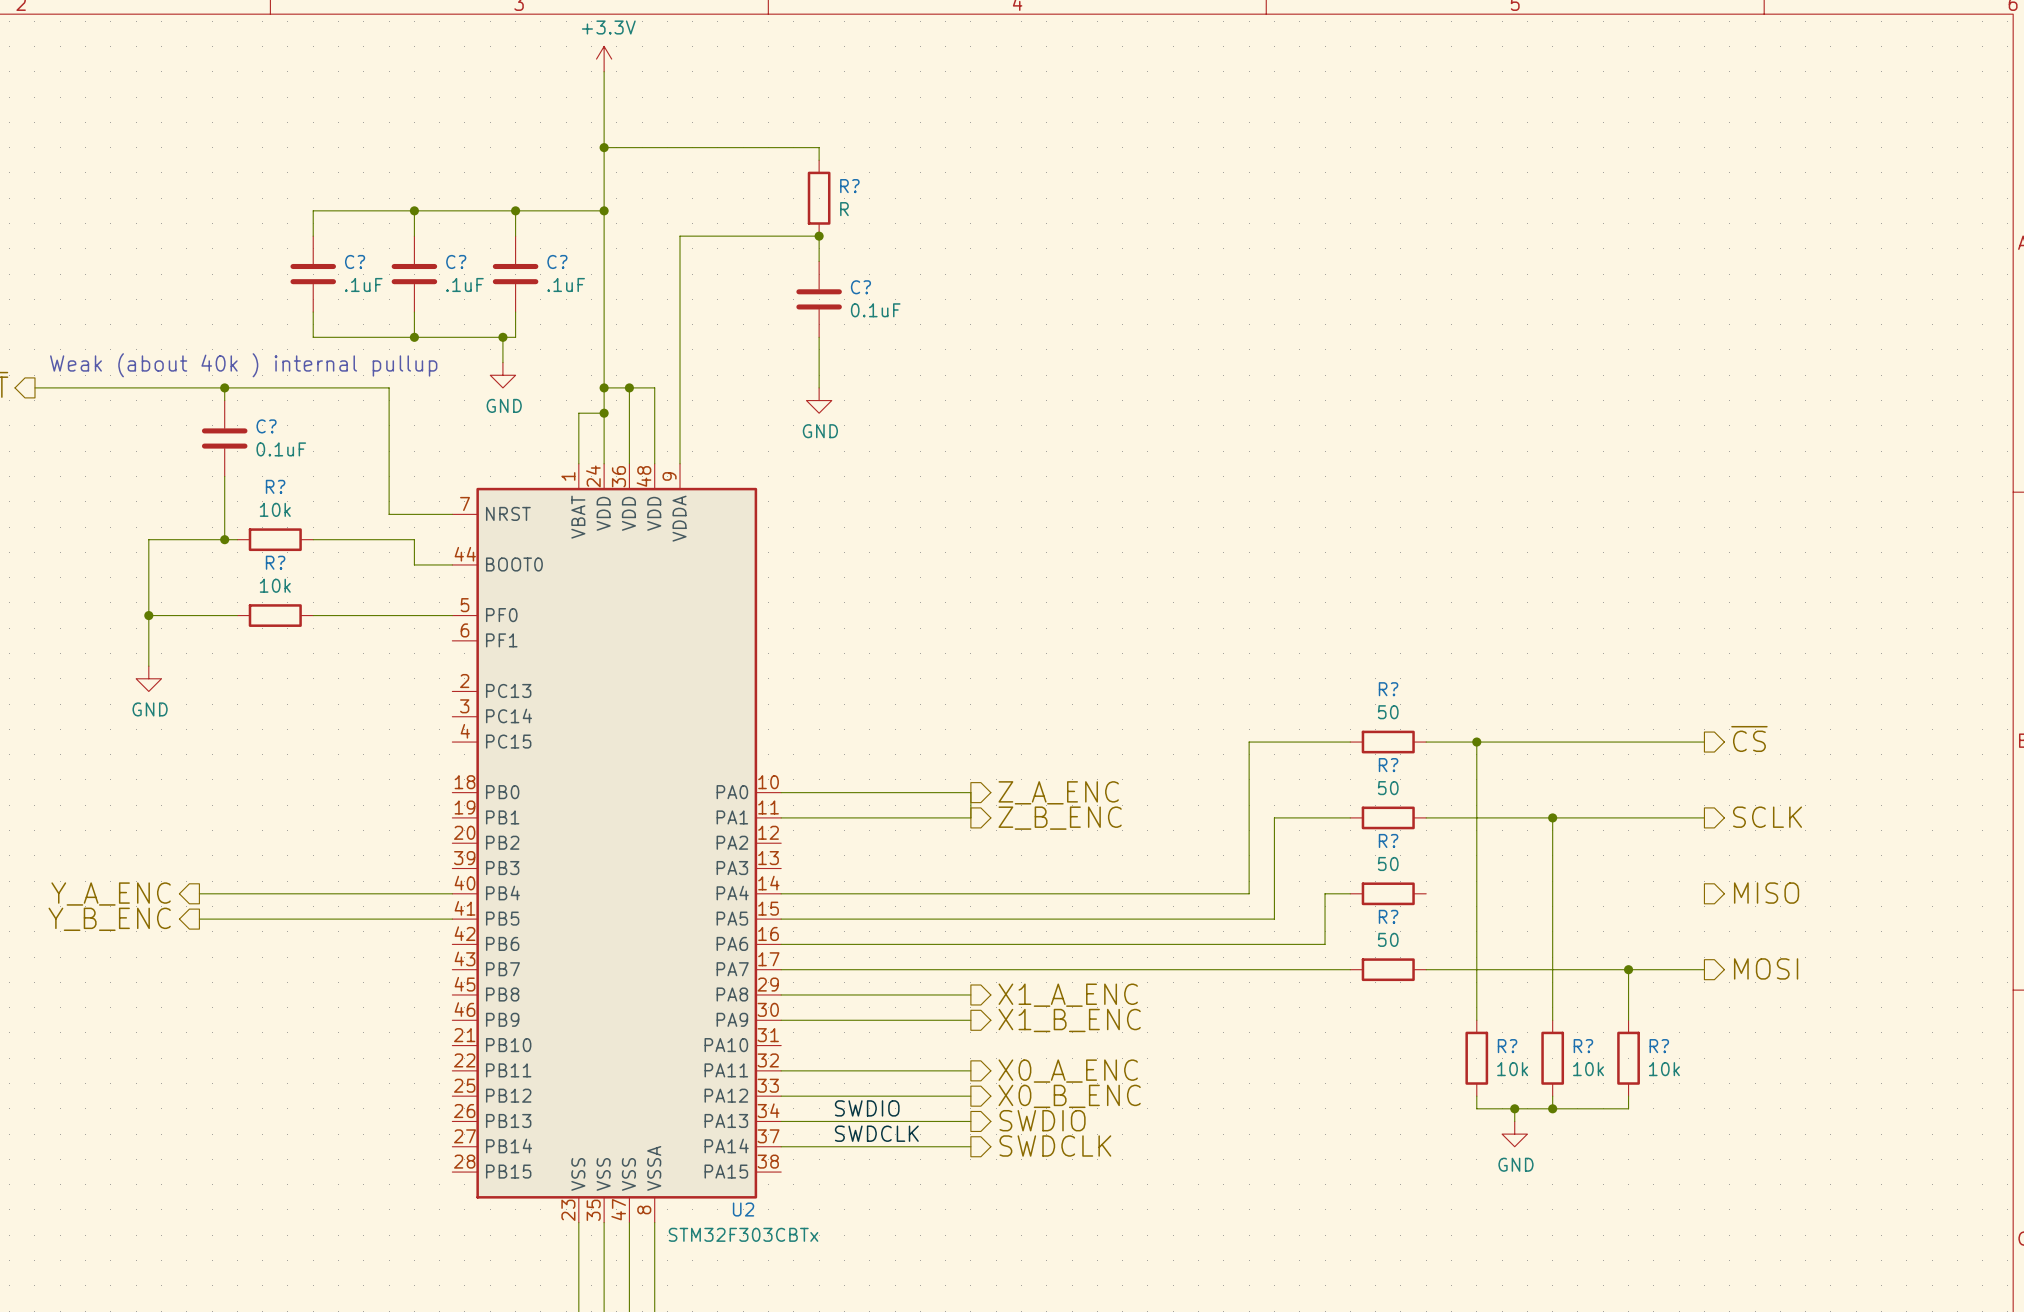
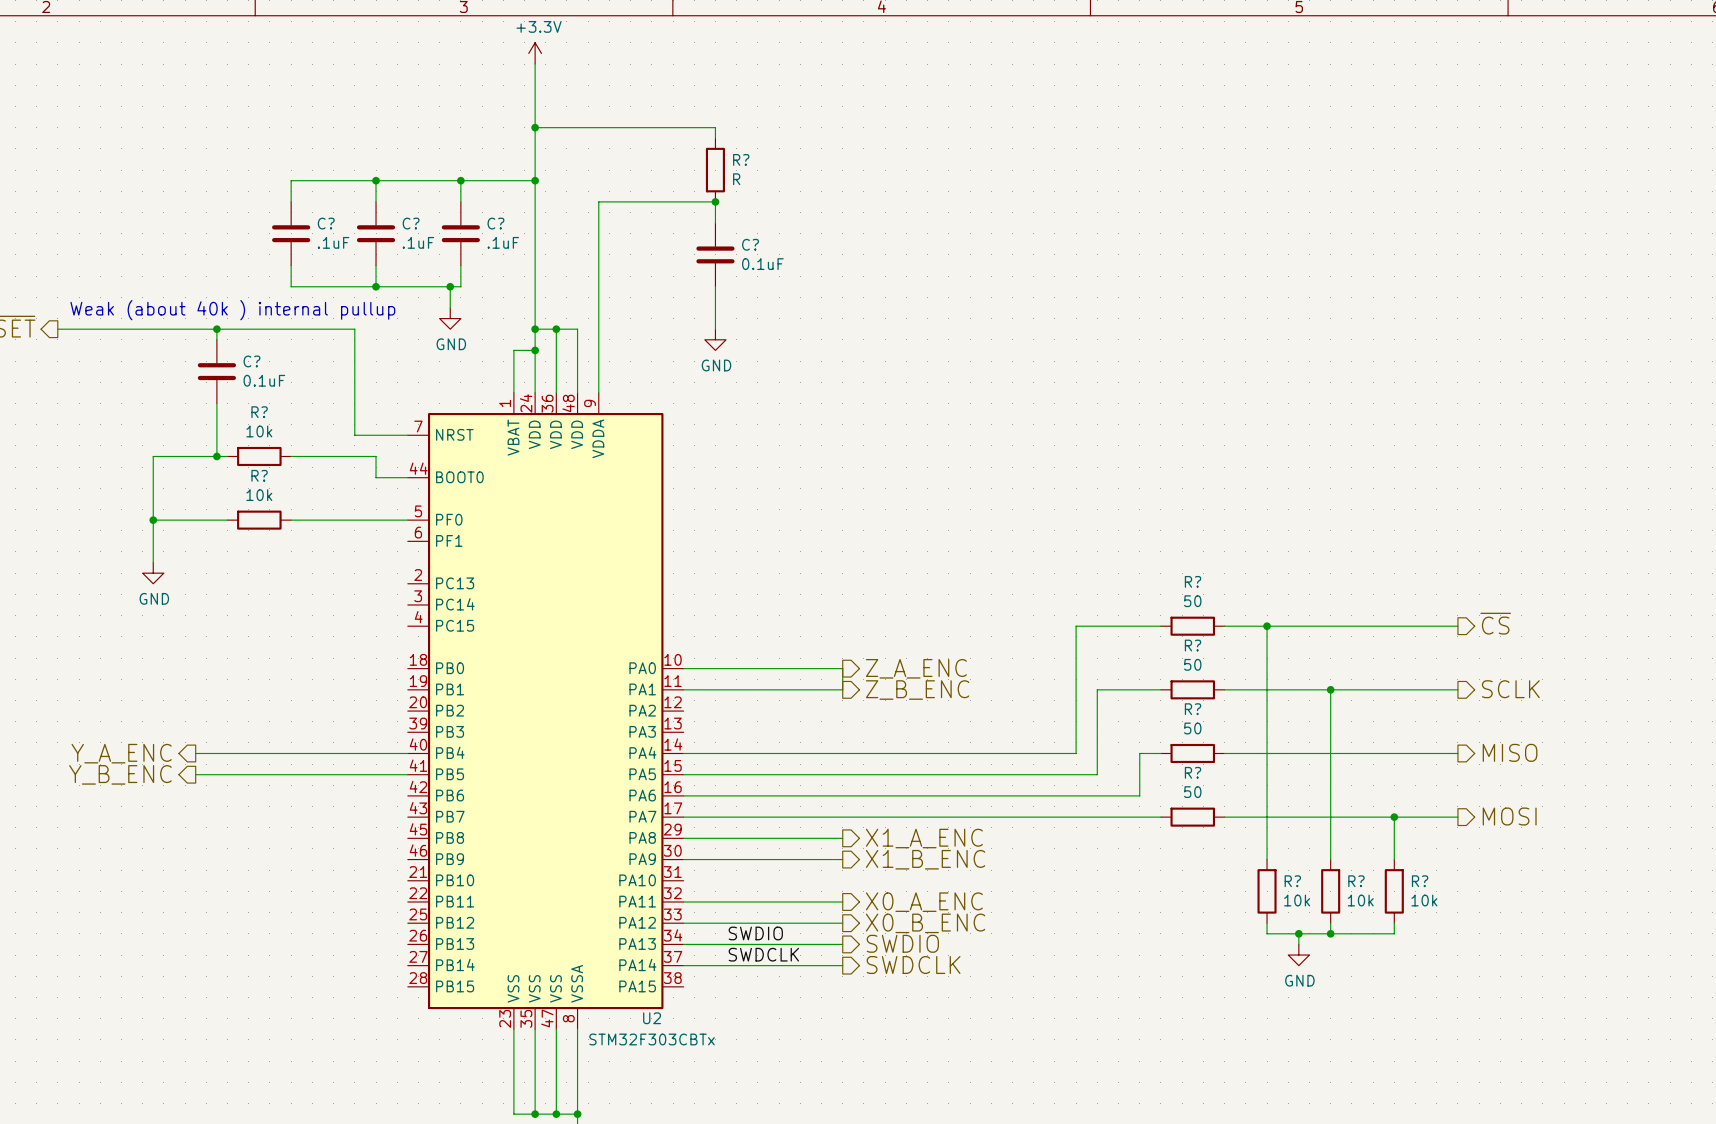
wire: none -> (1224, 753) (1457, 753)

